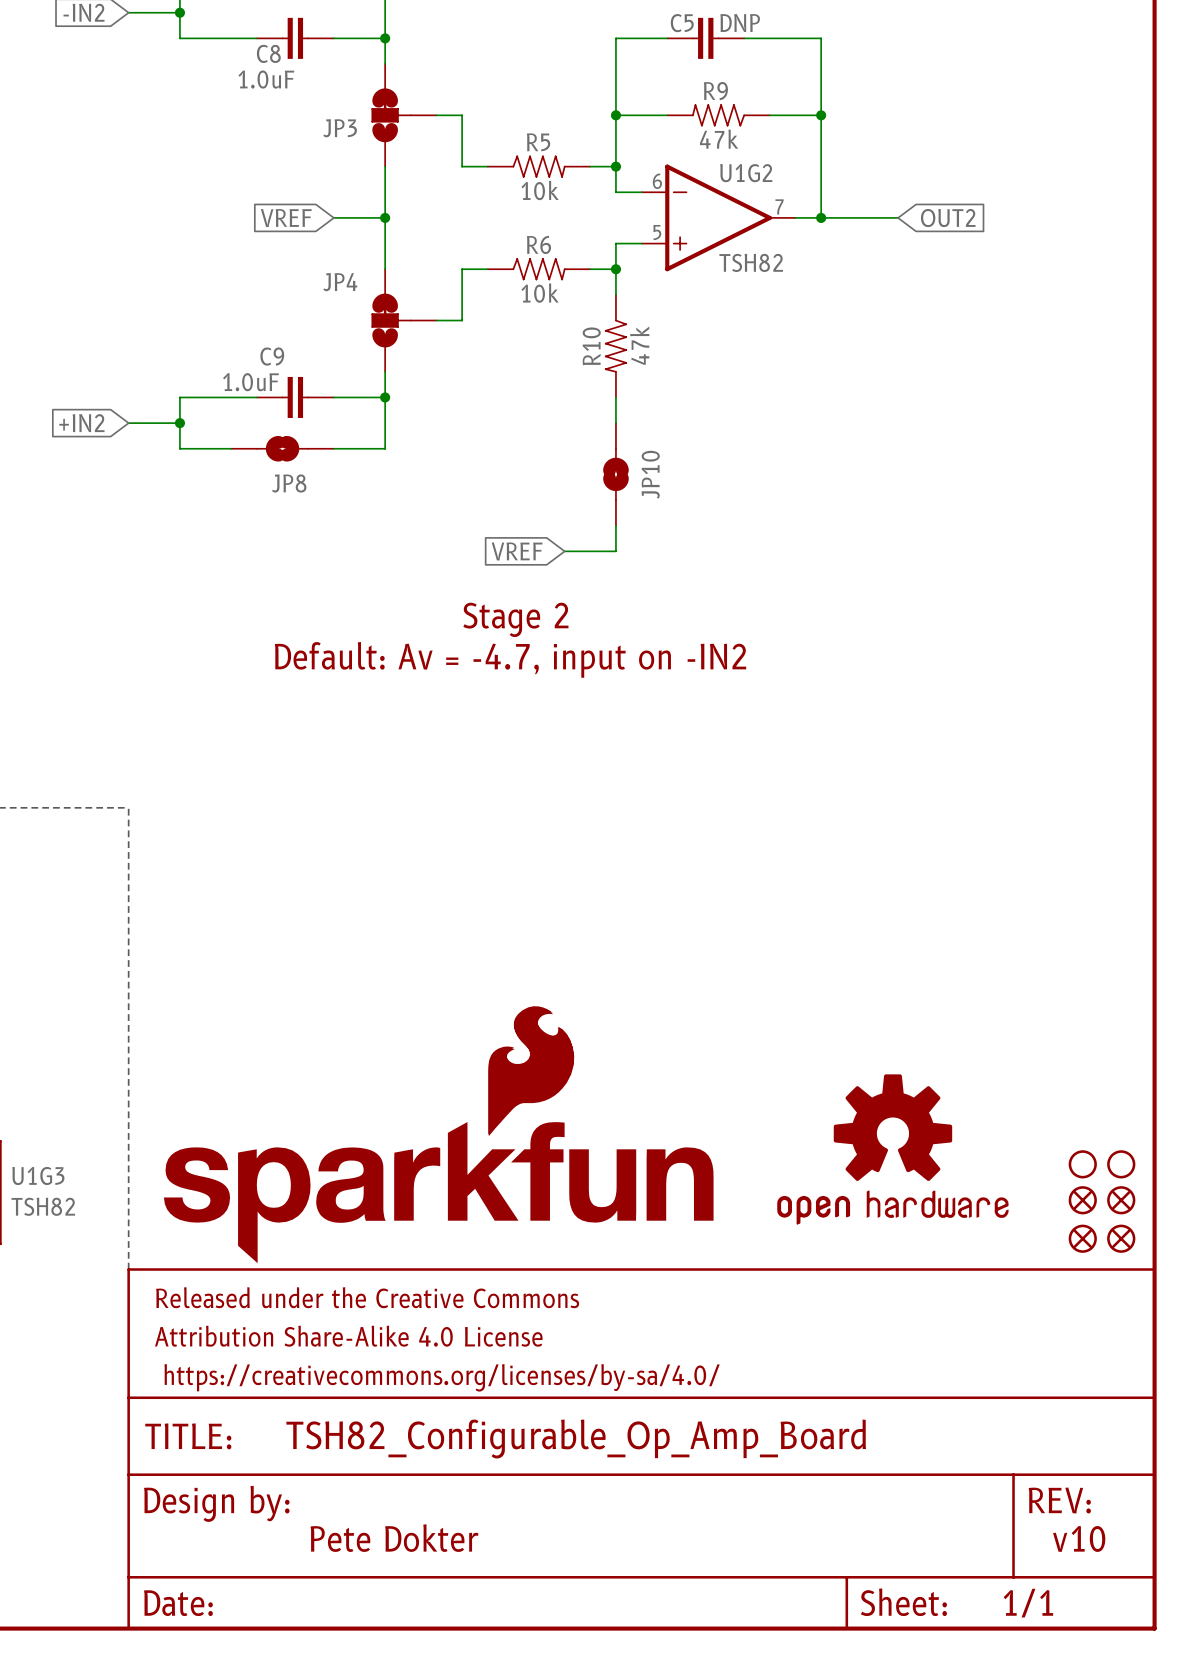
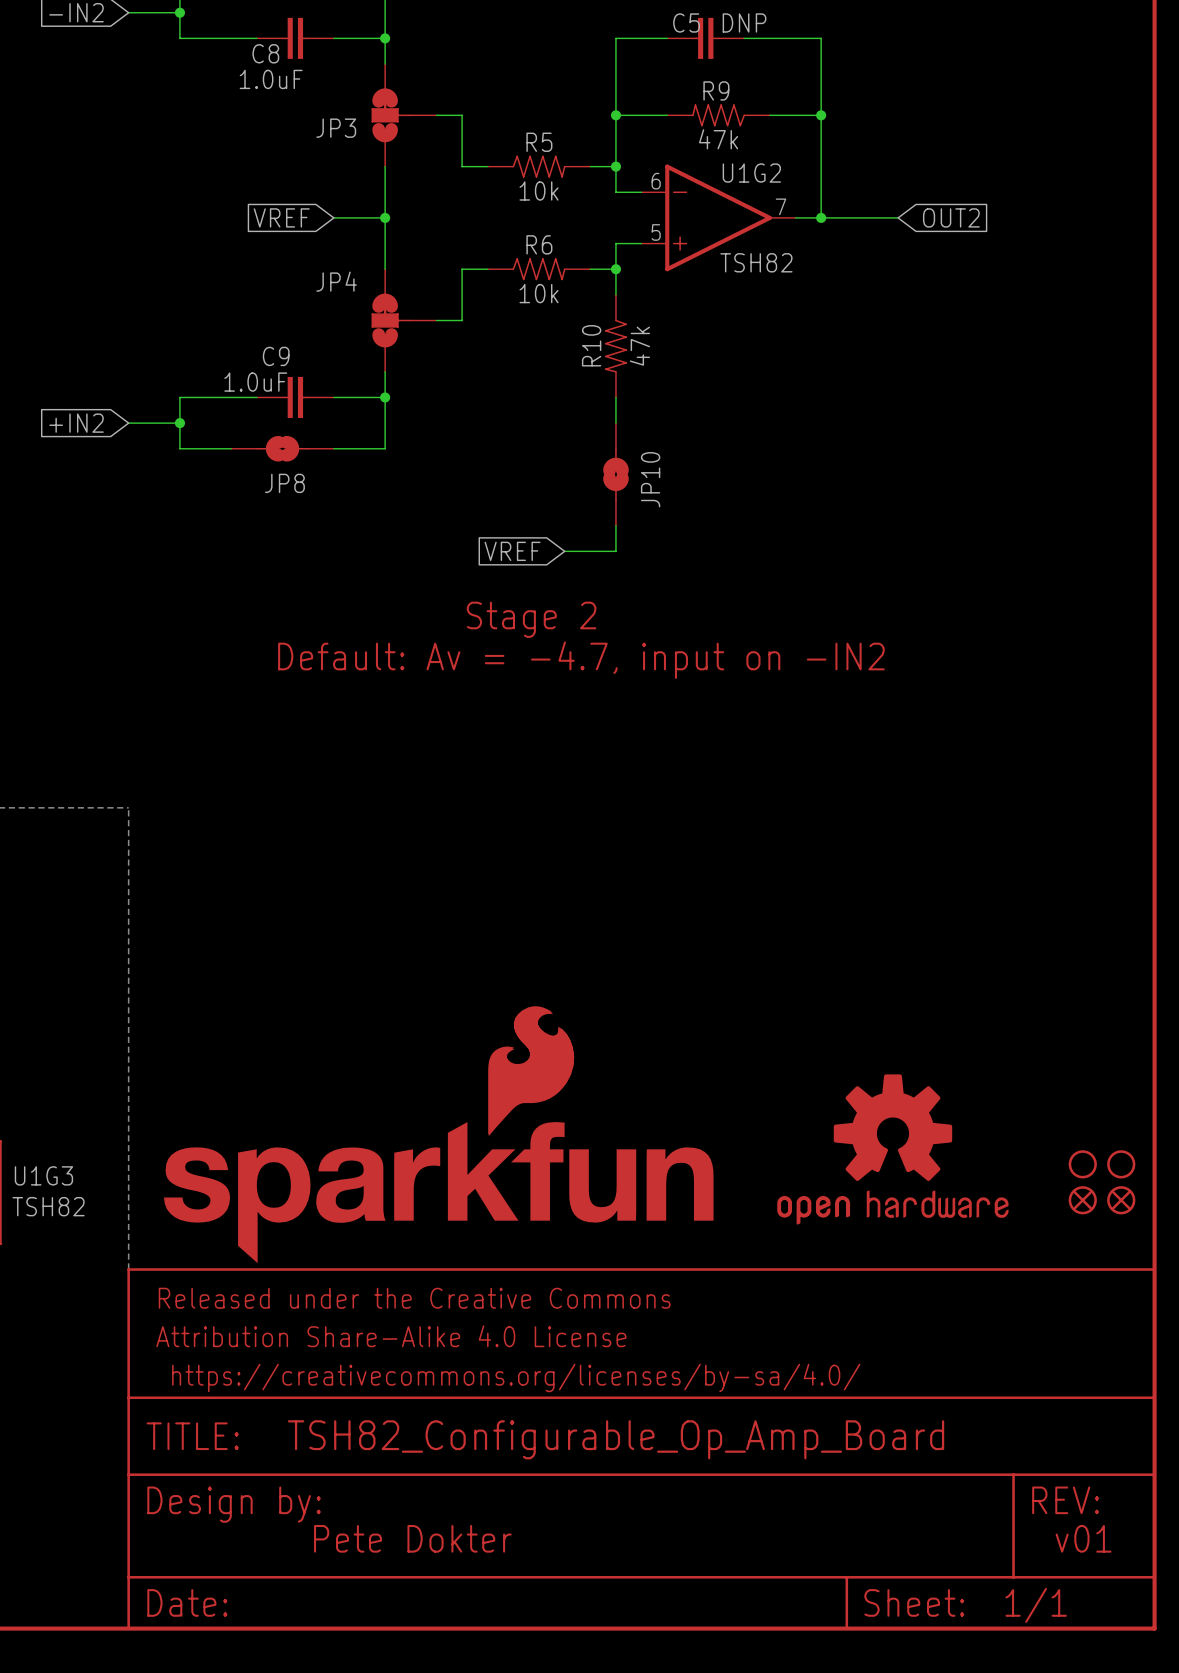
part: (1082, 1238) -> none
part: (1121, 1238) -> none
text: v10 (1079, 1538) -> v01 (1083, 1538)

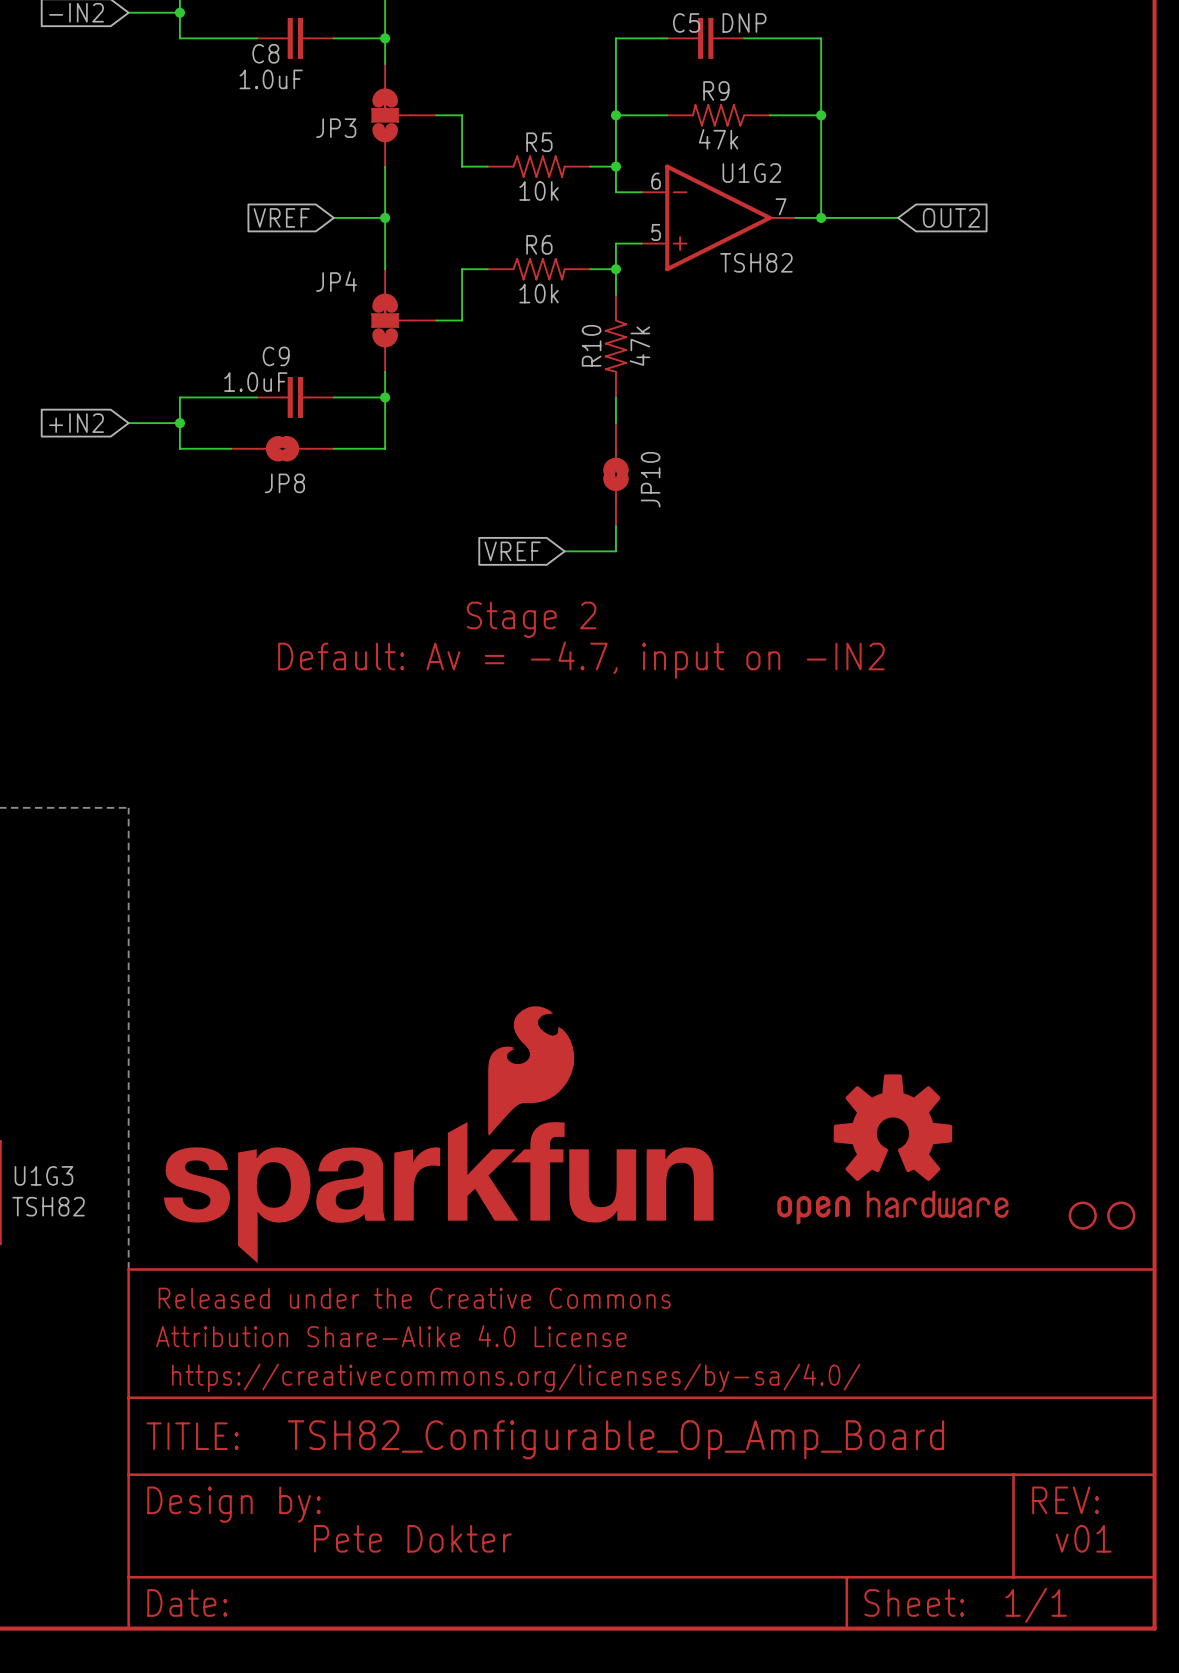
part: (1082, 1164) -> none
part: (1121, 1164) -> none
part: (1082, 1200) -> none
part: (1121, 1200) -> none
part: none -> (1082, 1215)
part: none -> (1121, 1215)

